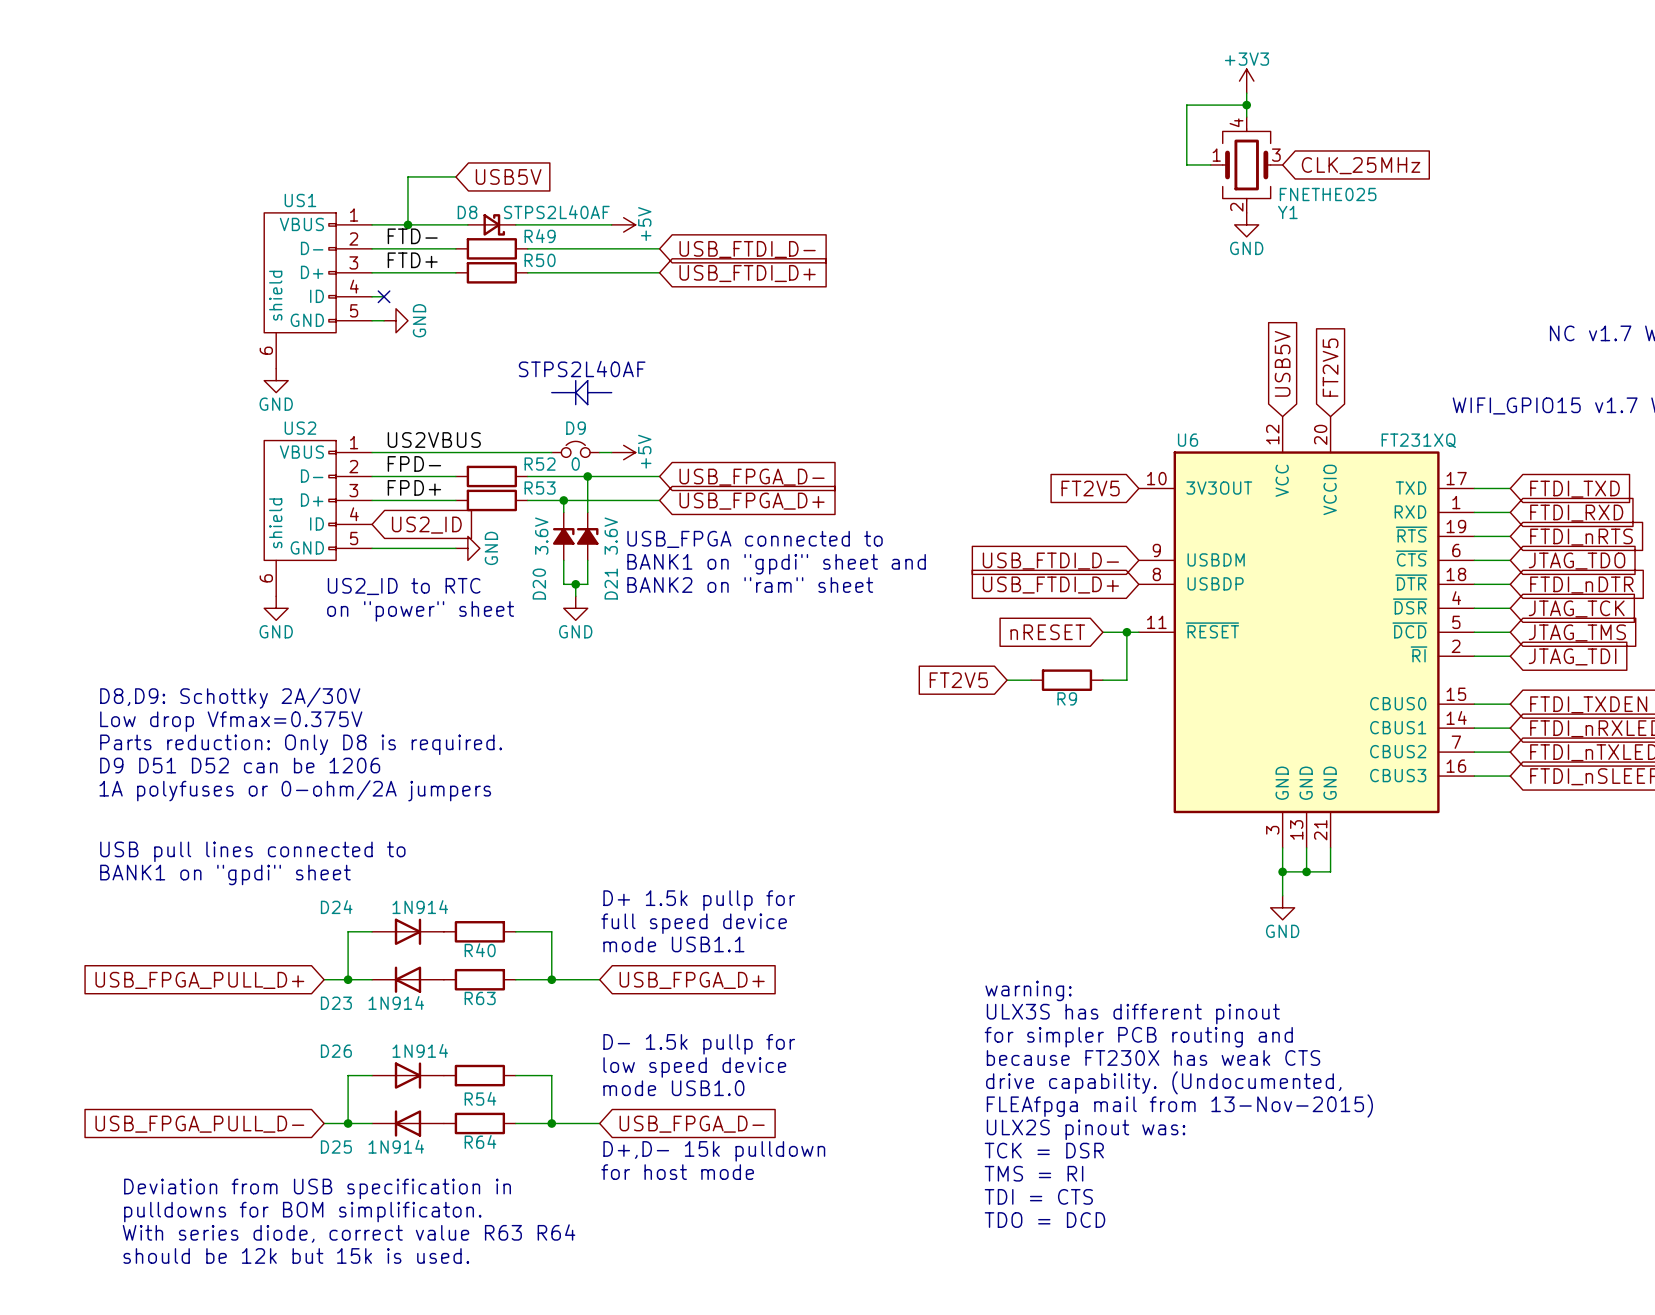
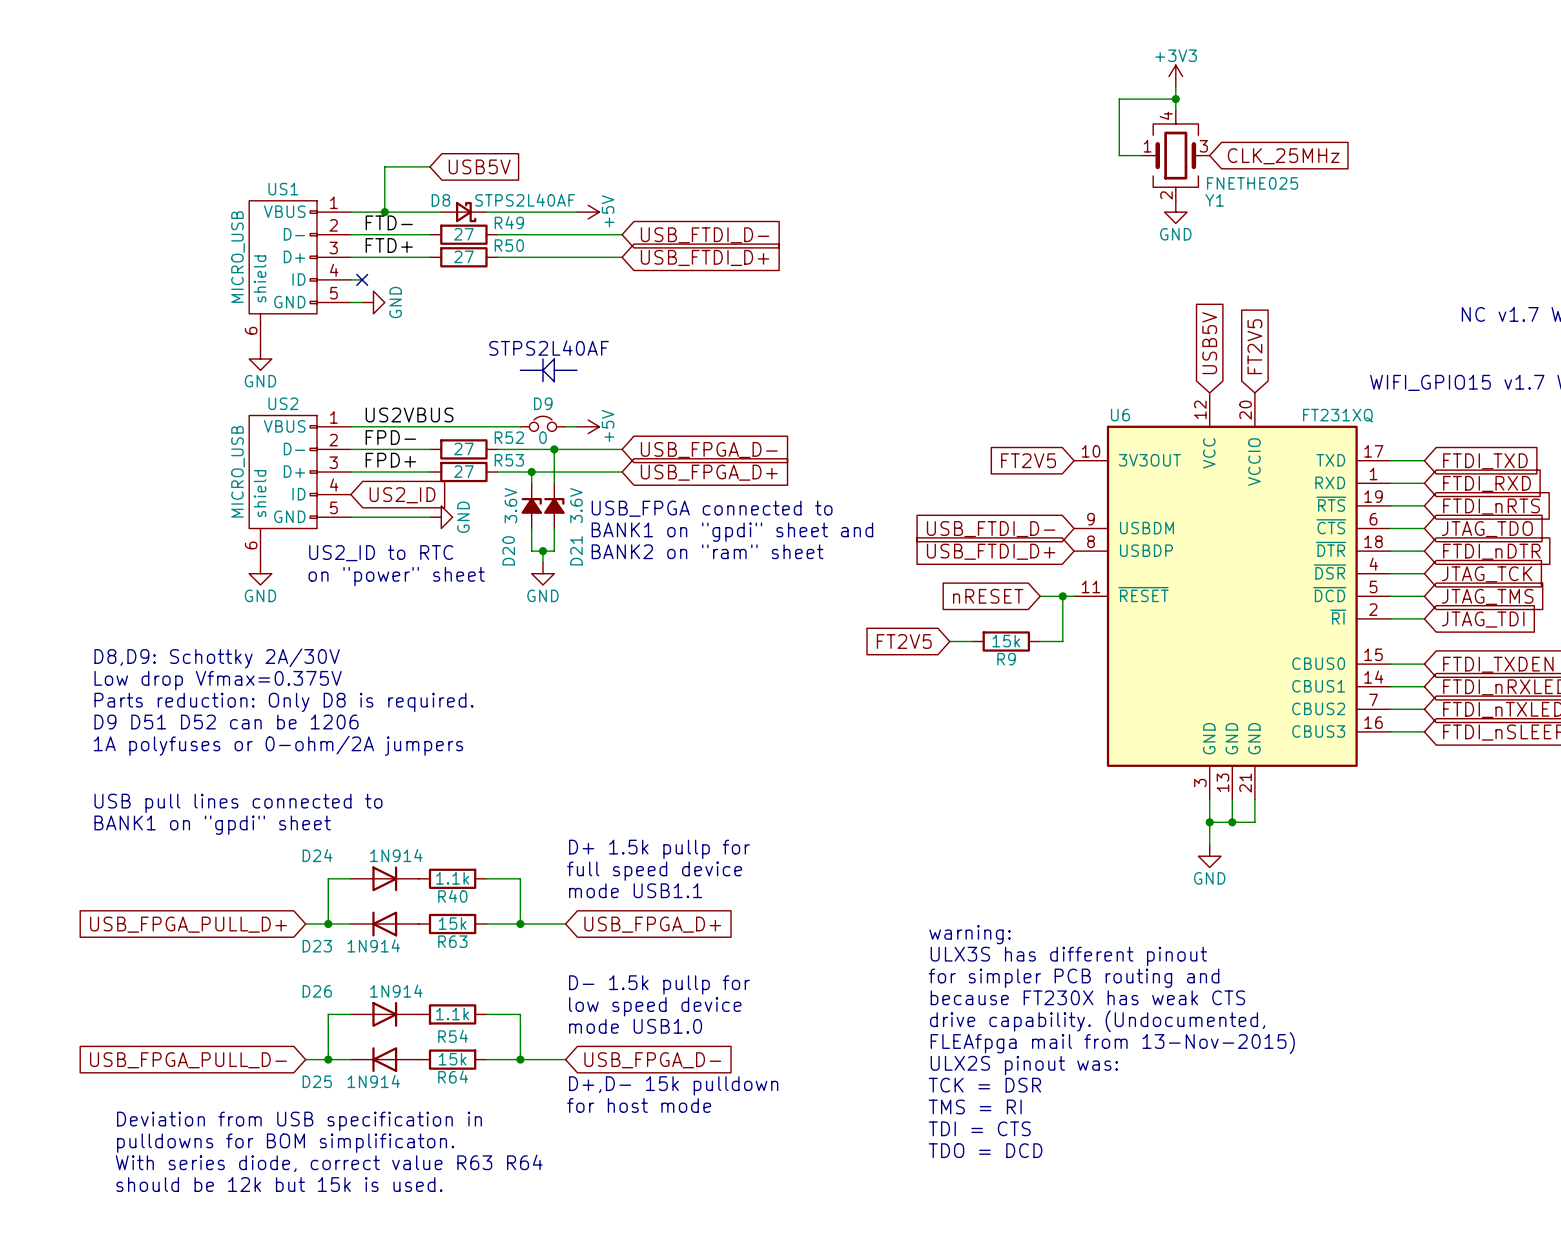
R49 value: none -> 27 (463, 234)
US1 value: none -> MICRO_USB (238, 257)
R50 value: none -> 27 (463, 256)
R52 value: none -> 27 (463, 448)
US2 value: none -> MICRO_USB (238, 471)
R53 value: none -> 27 (463, 471)
R9 value: none -> 15k (1006, 641)
R40 value: none -> 1.1k (452, 878)
R63 value: none -> 15k (452, 923)
R54 value: none -> 1.1k (452, 1013)
R64 value: none -> 15k (452, 1059)

